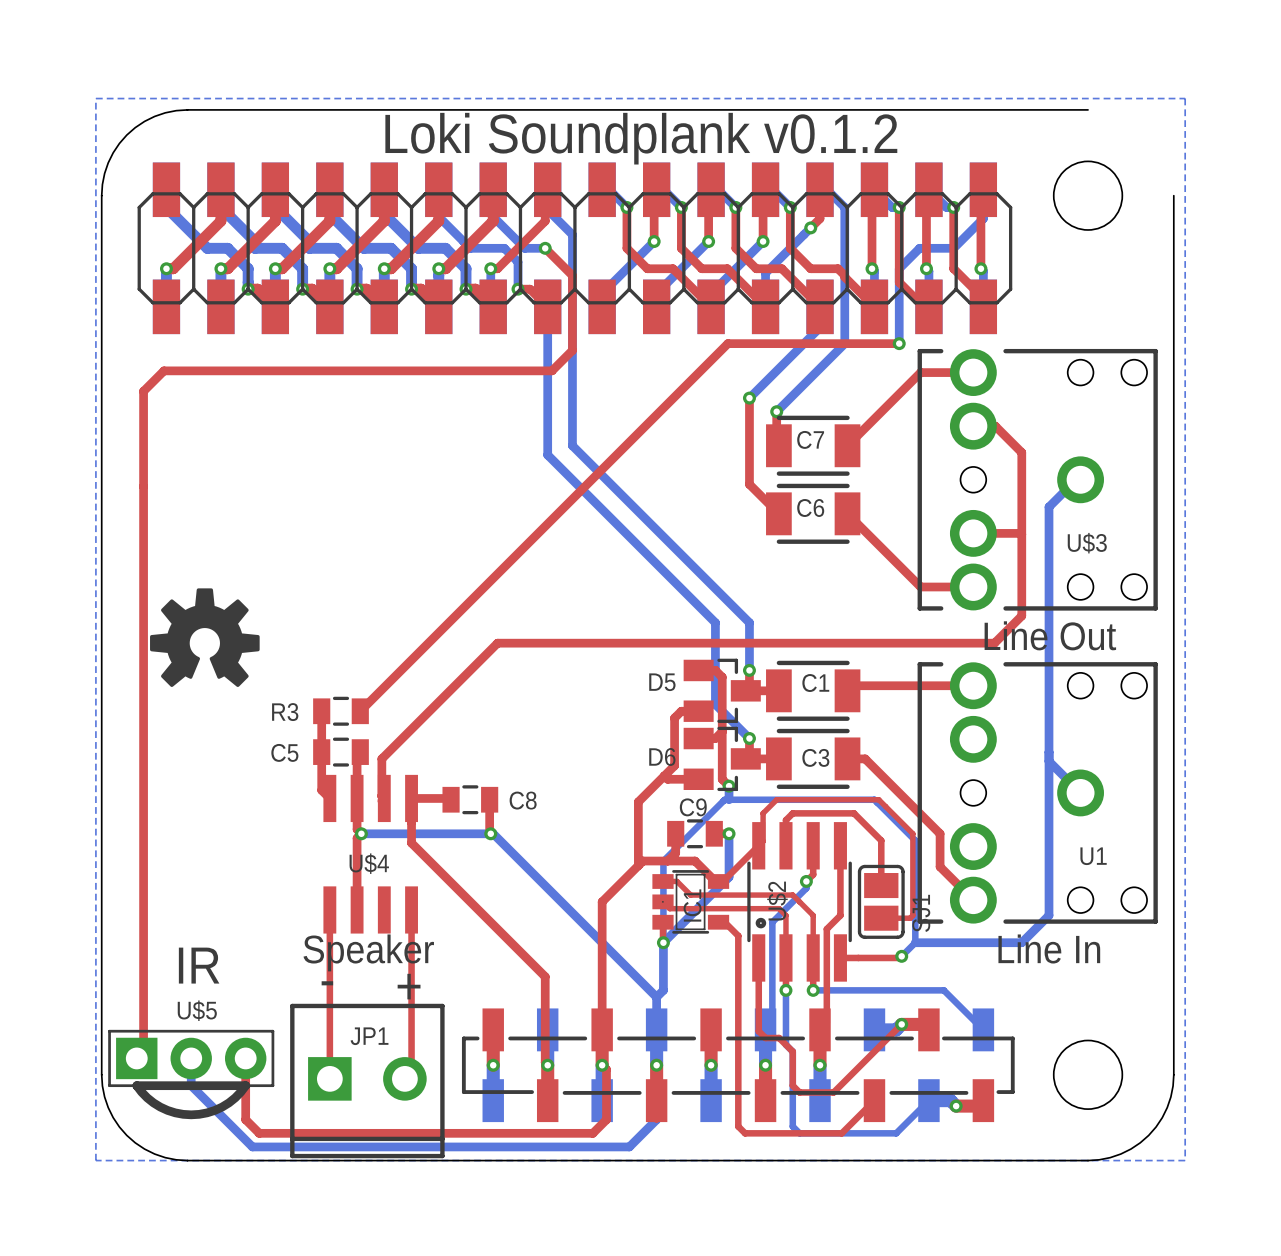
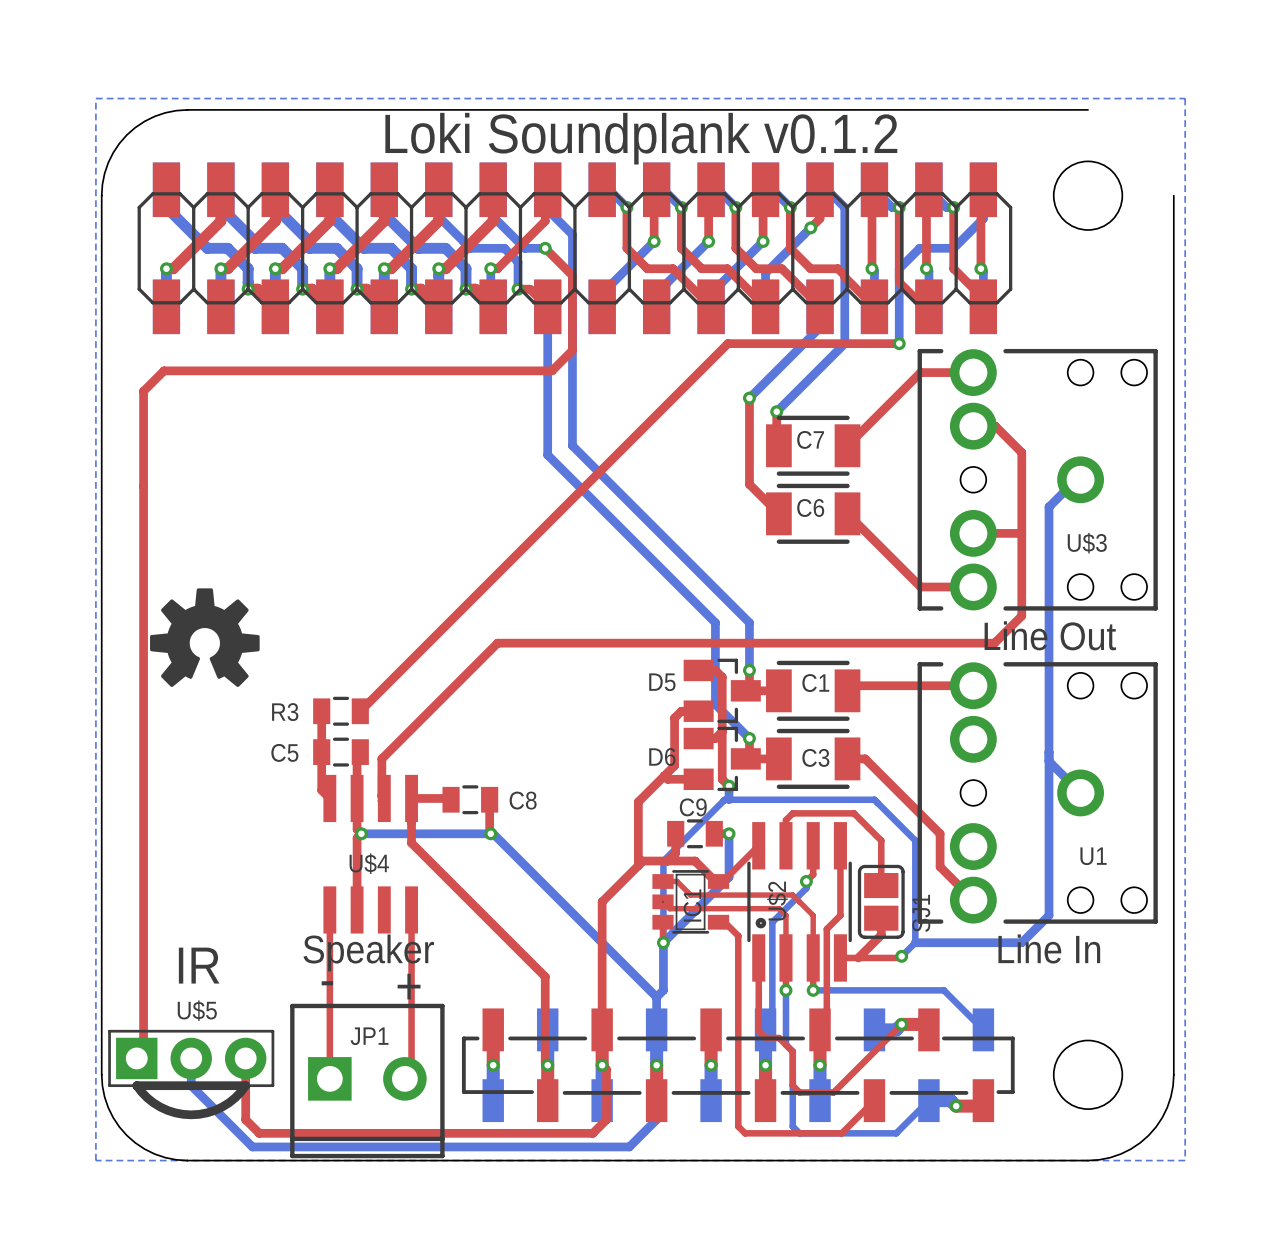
top track: (758, 845) (763, 841) (763, 813) (776, 799) (878, 799) (912, 833) (912, 915) (910, 918) (881, 918) -> (858, 957) (881, 935) (881, 918)

